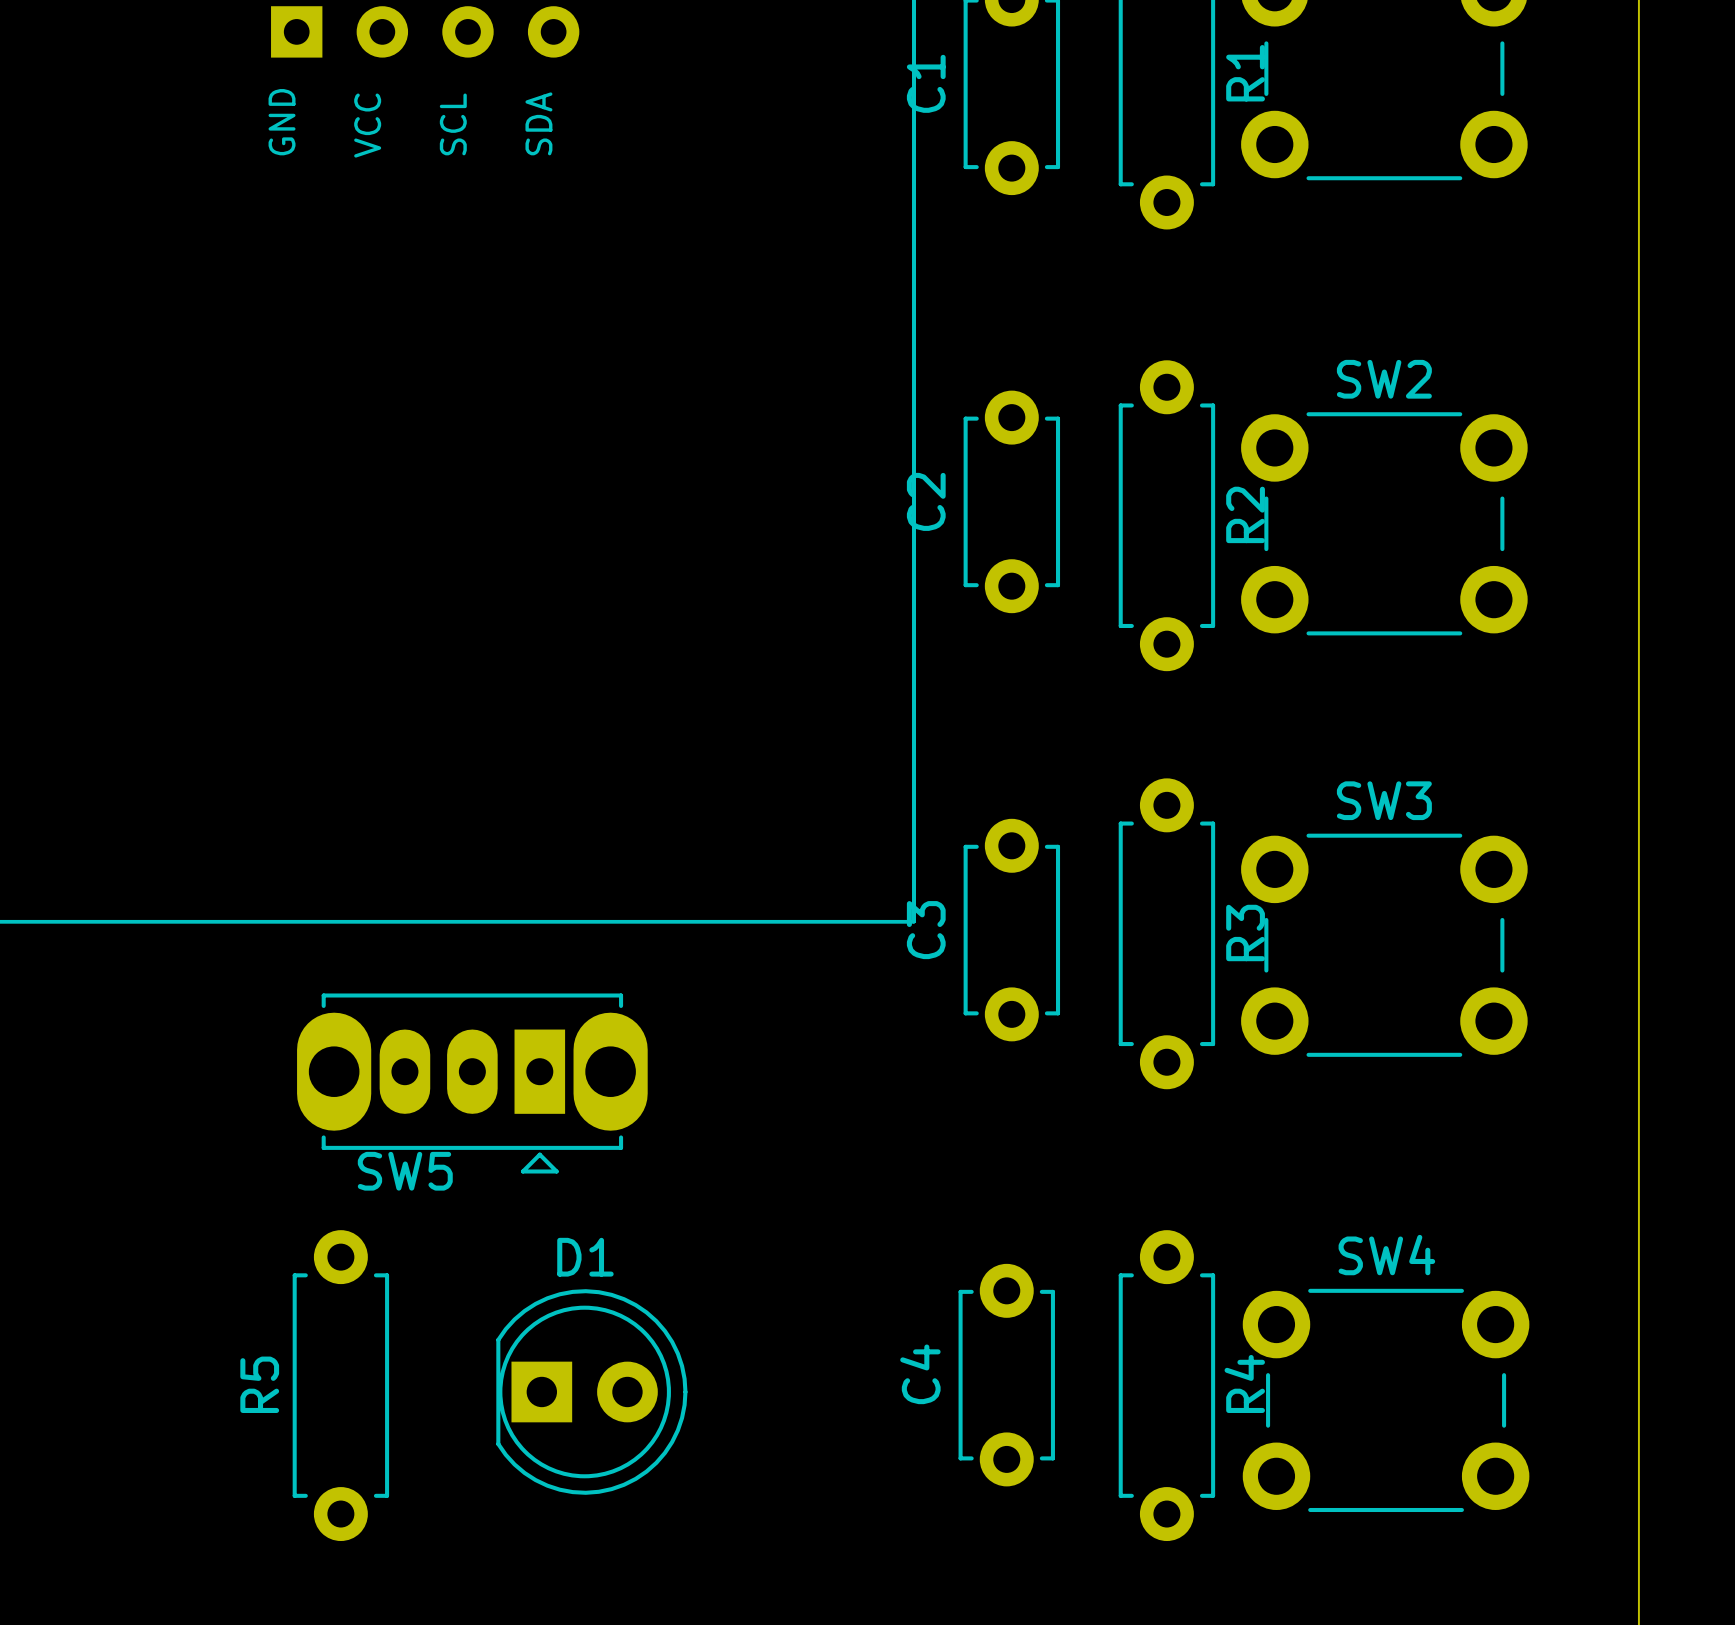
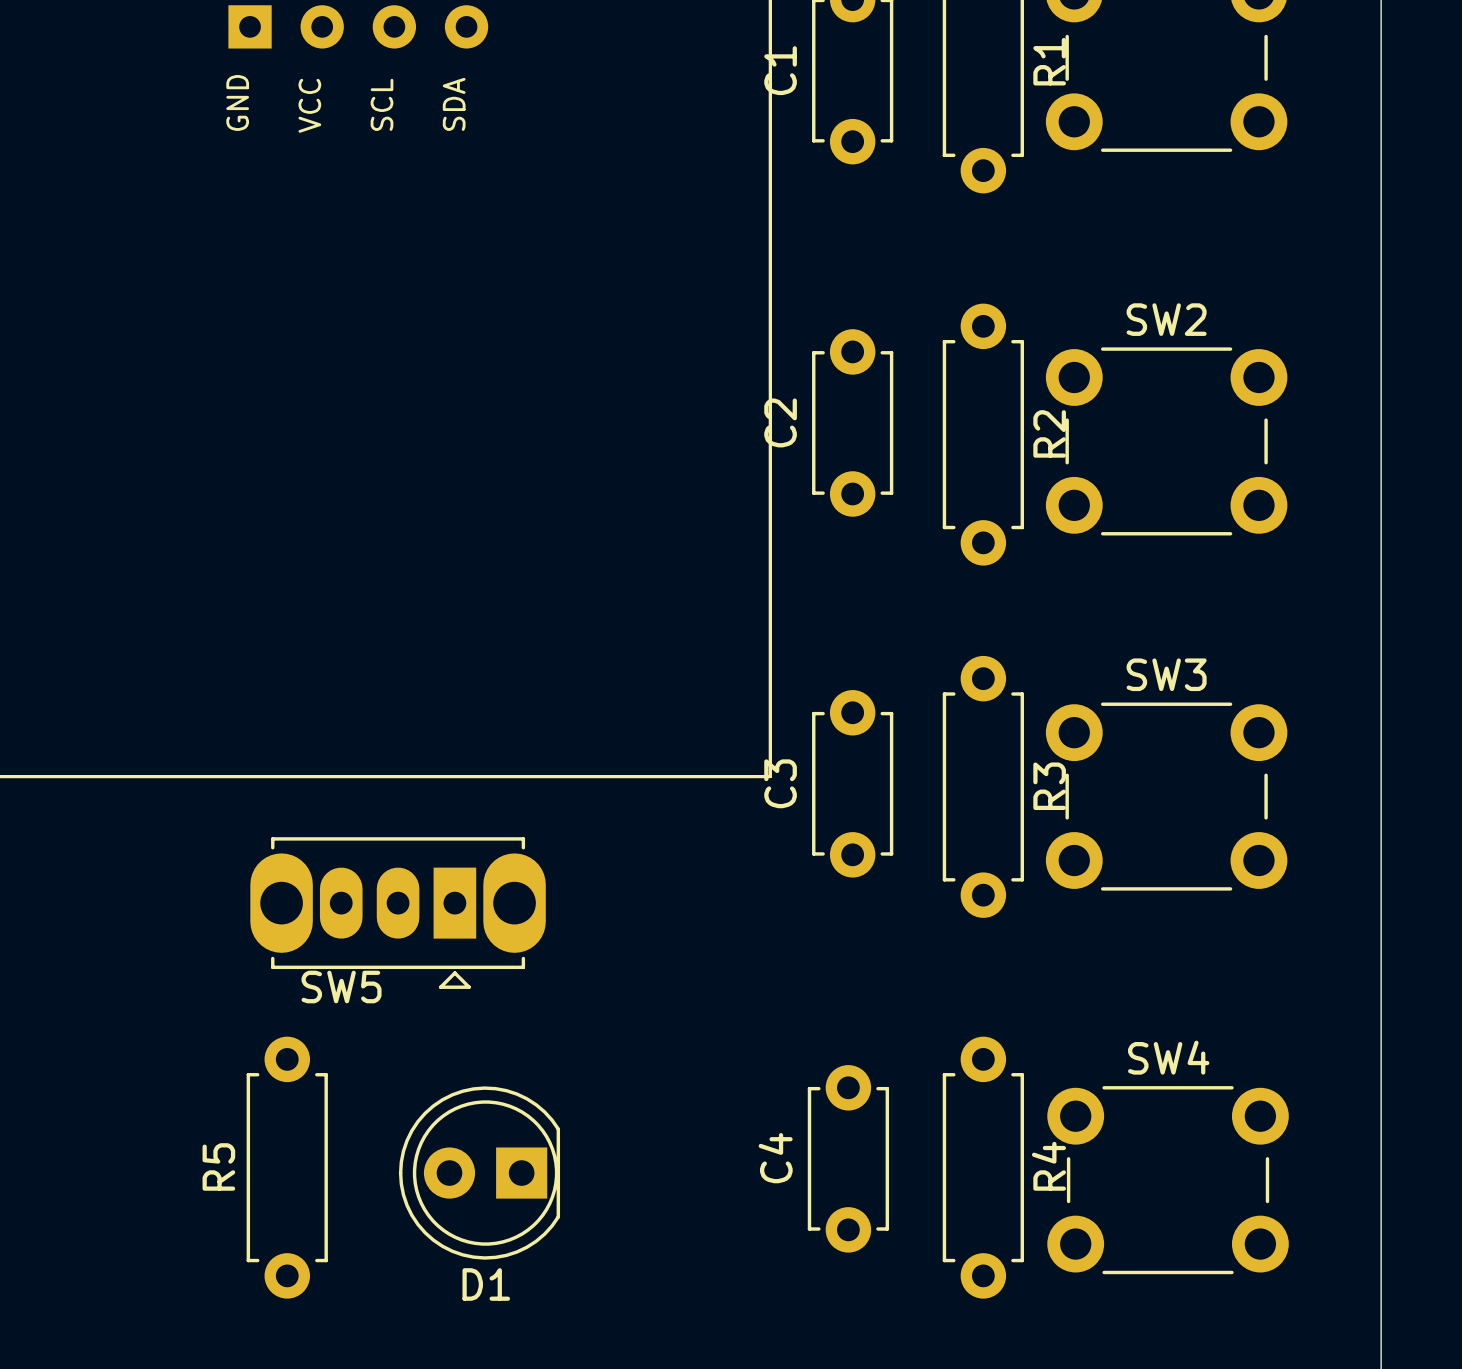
D1 rotation: 0° (591, 1391) -> 180° (479, 1173)

